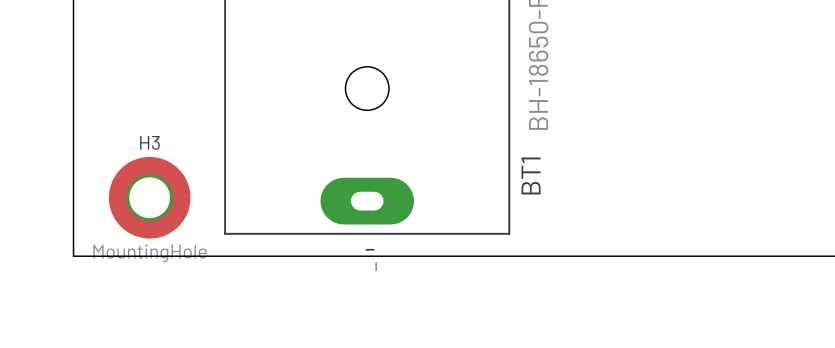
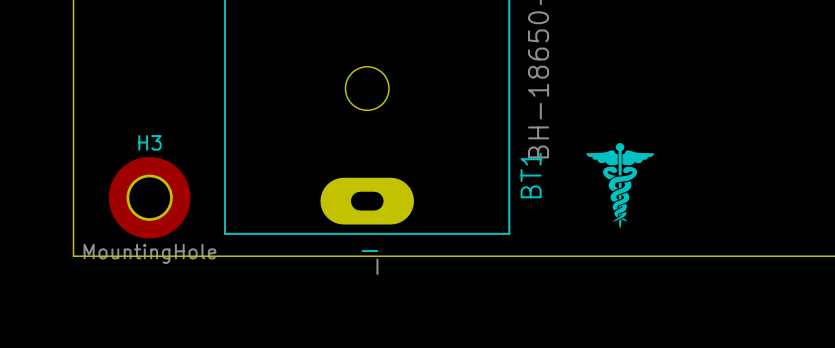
drawing: none -> [586, 143, 655, 228]

